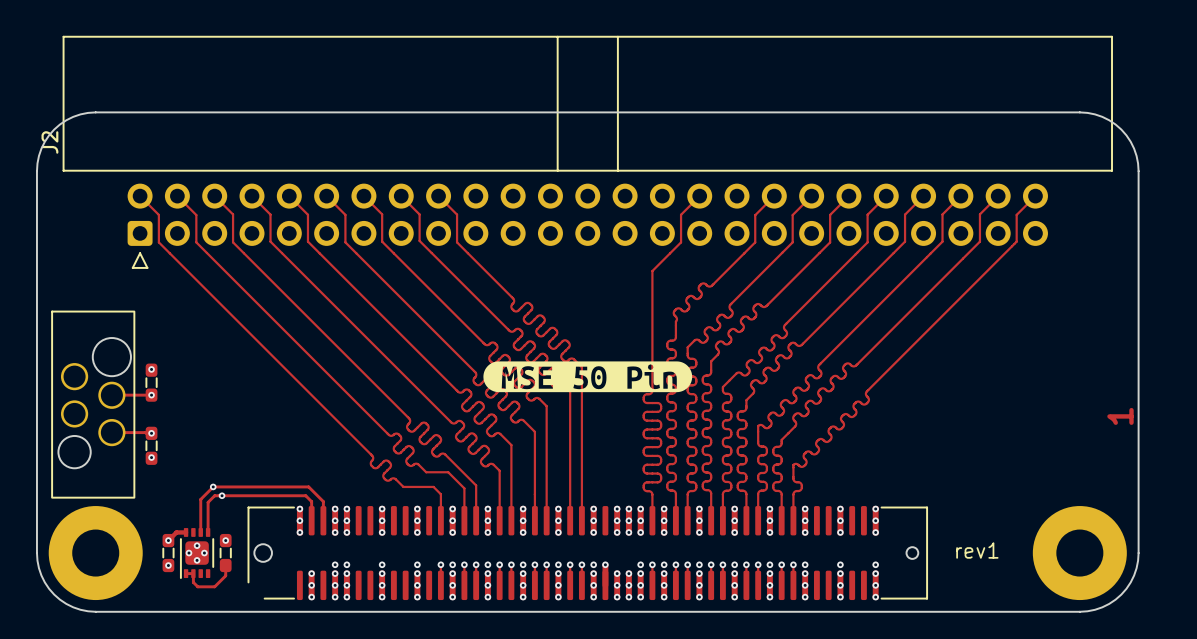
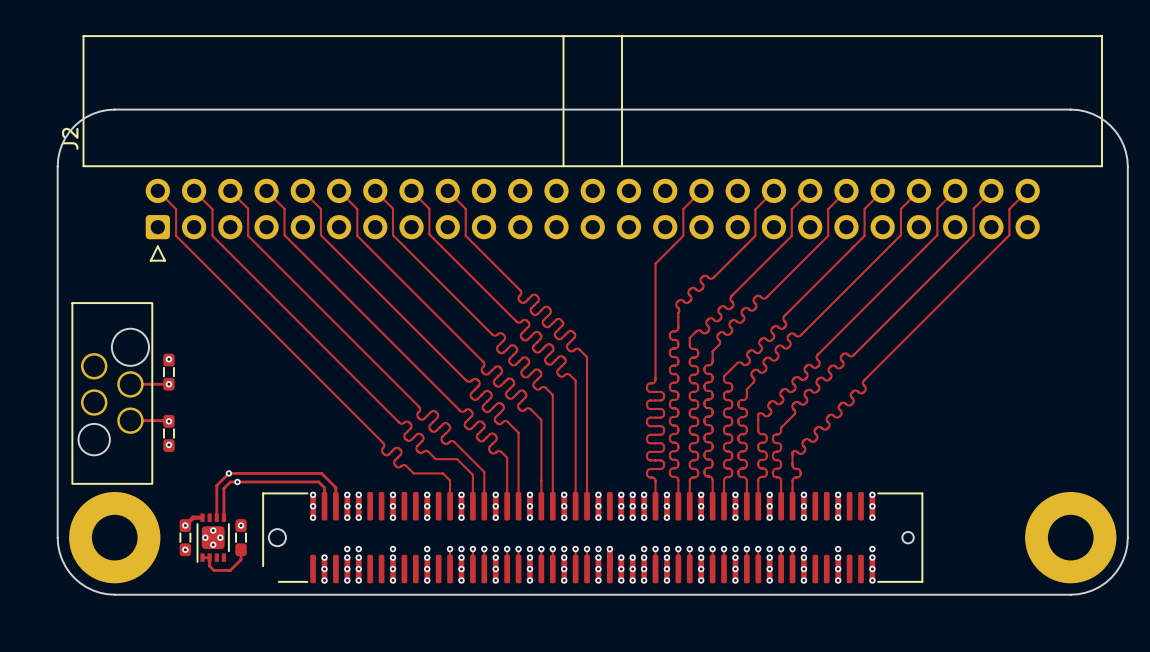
drawing: [483, 361, 693, 393] -> none
text: 1 (1120, 416) -> none
text: rev1 (977, 550) -> none

